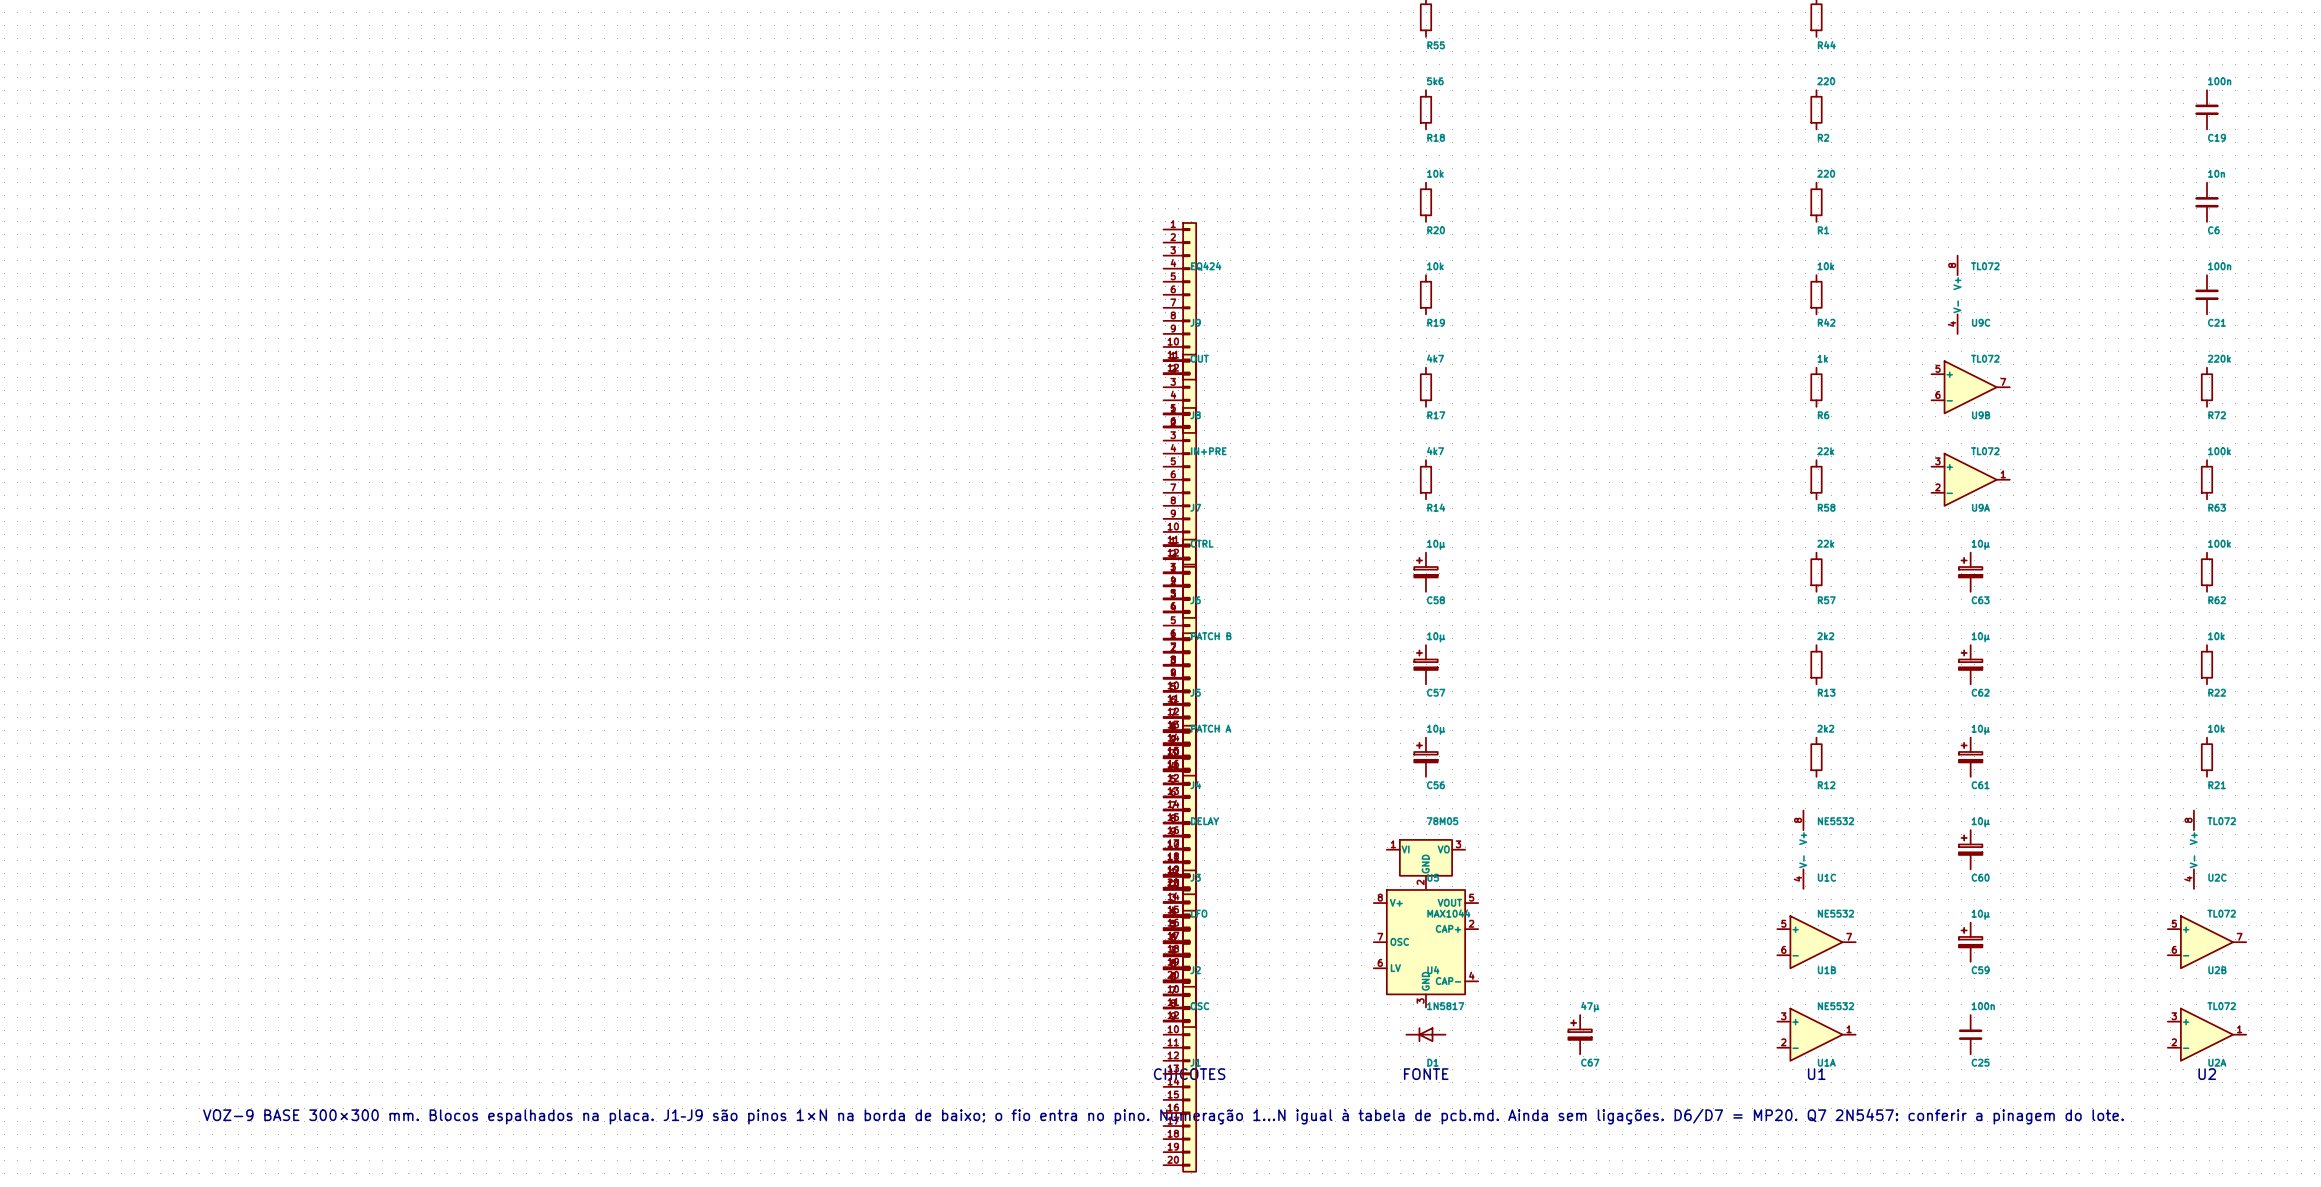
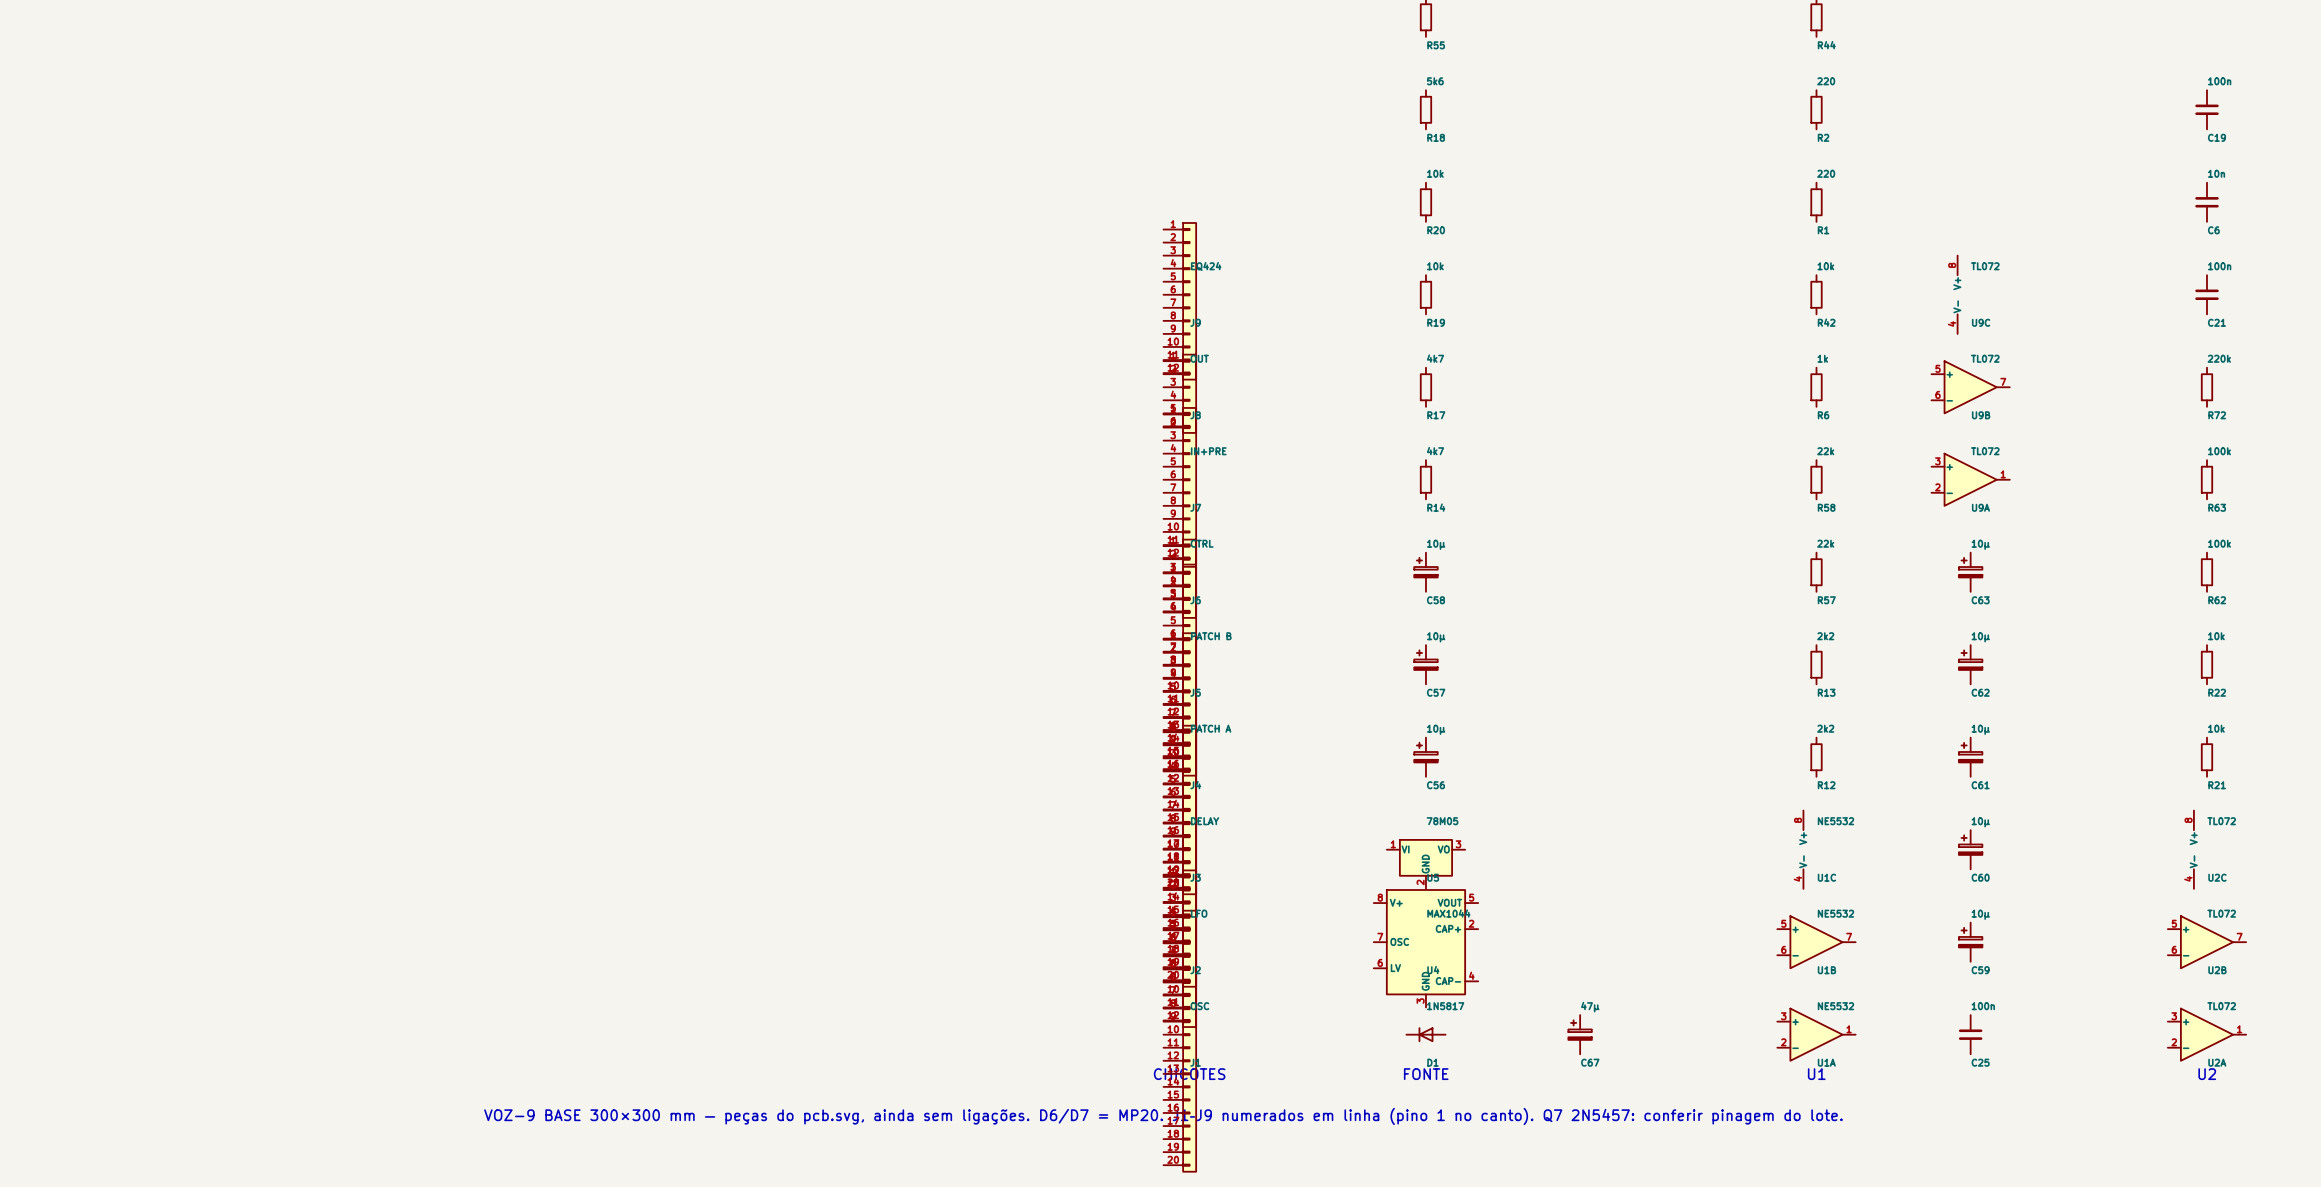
text: VOZ-9 BASE 300×300 mm. Blocos espalhados na placa. J1–J9 são pinos 1×N na borda de baixo; o fio entra no pino. Numeração 1…N igual à tabela de pcb.md. Ainda sem ligações. D6/D7 = MP20. Q7 2N5457: conferir a pinagem do lote. (1163, 1116) -> VOZ-9 BASE 300×300 mm — peças do pcb.svg, ainda sem ligações. D6/D7 = MP20. J1–J9 numerados em linha (pino 1 no canto). Q7 2N5457: conferir pinagem do lote. (1163, 1116)

